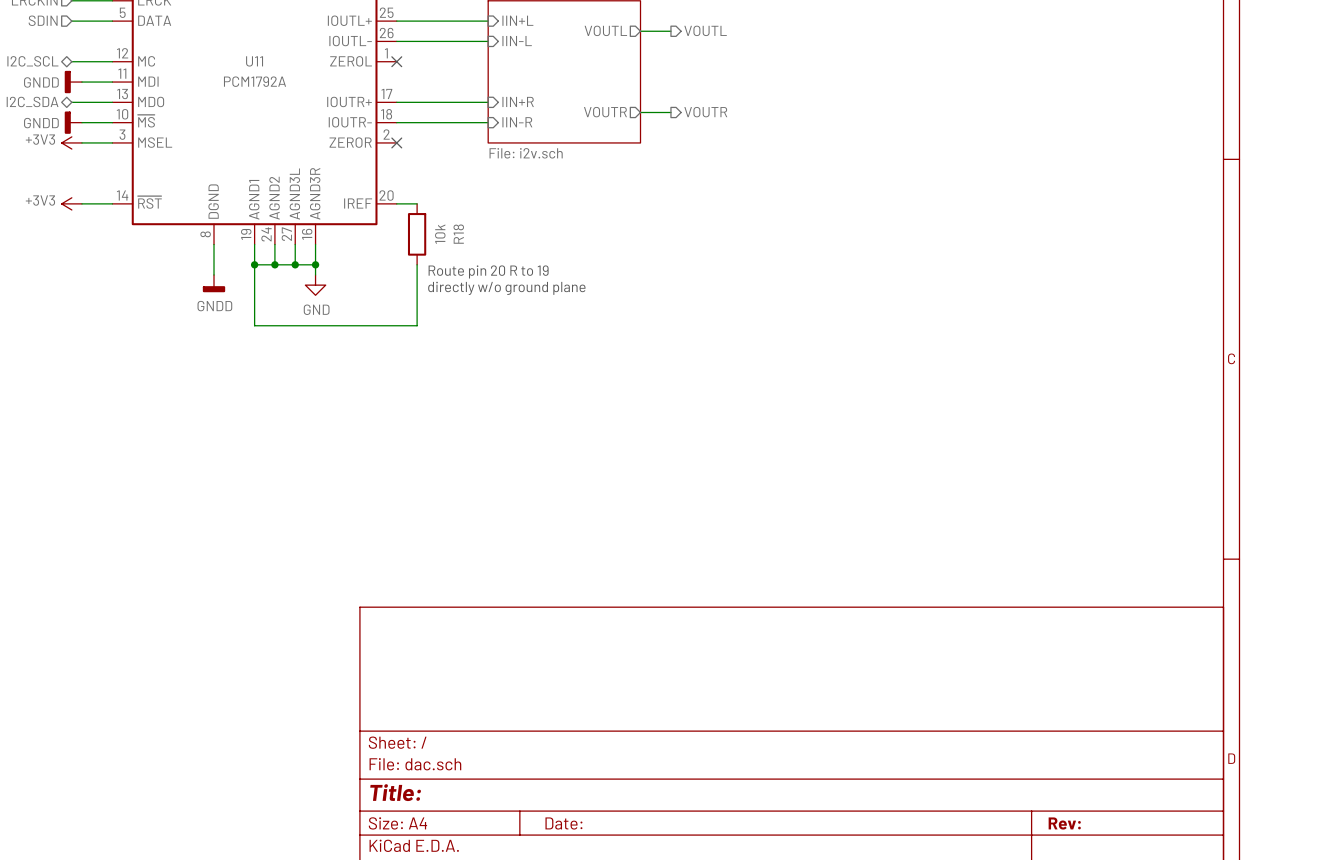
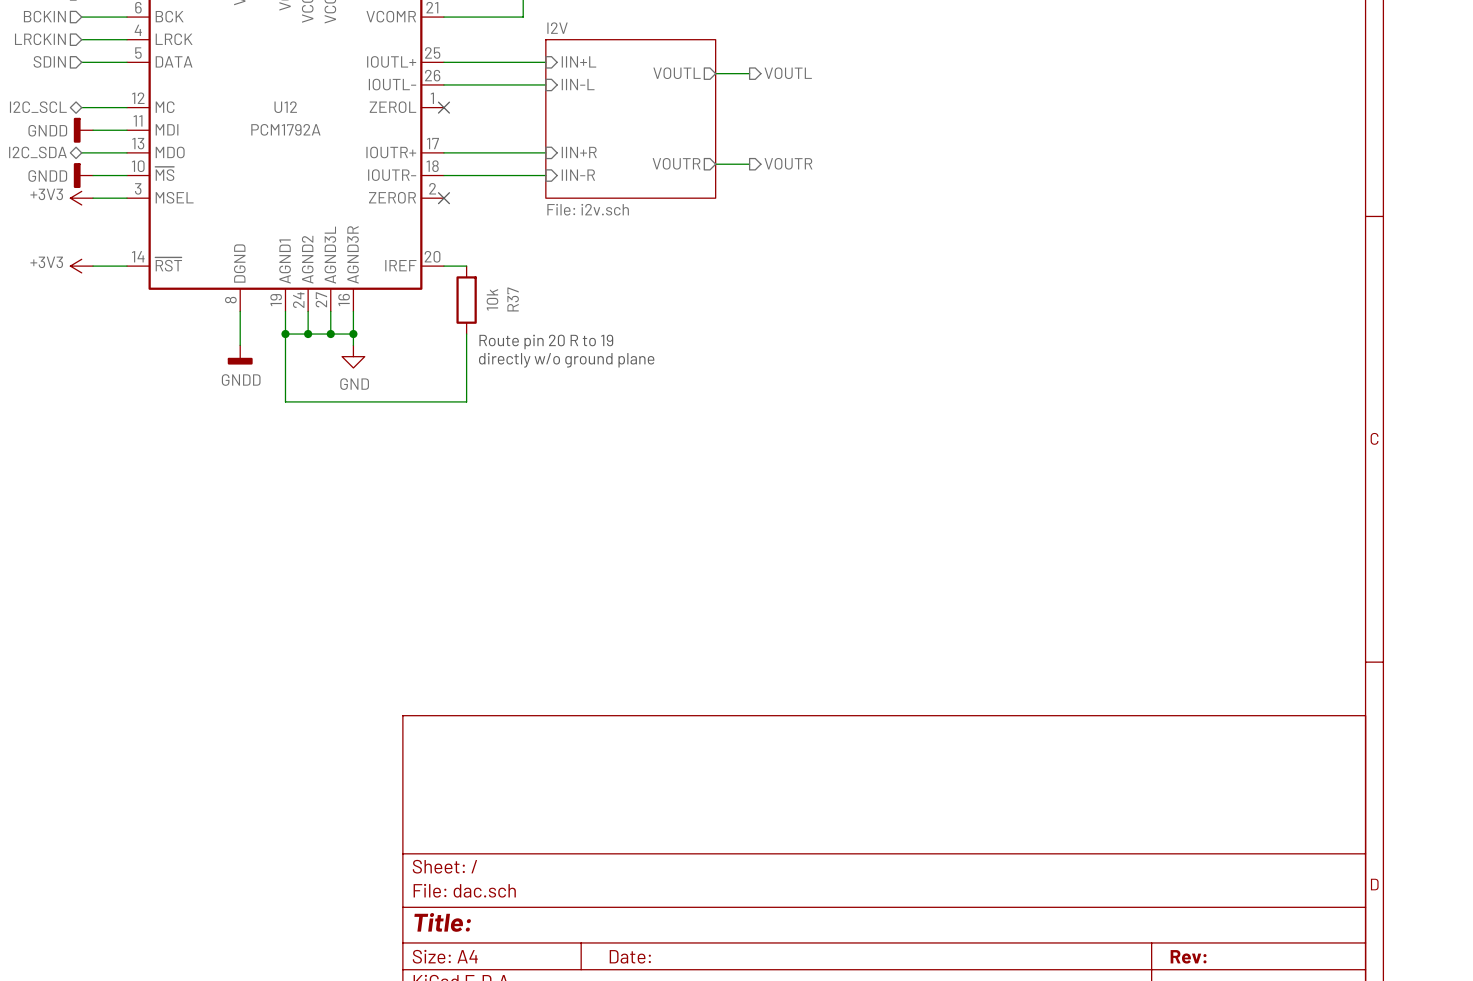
U11 name: U11 (254, 61) -> U12 (285, 107)
R18 name: R18 (458, 234) -> R37 (513, 299)

